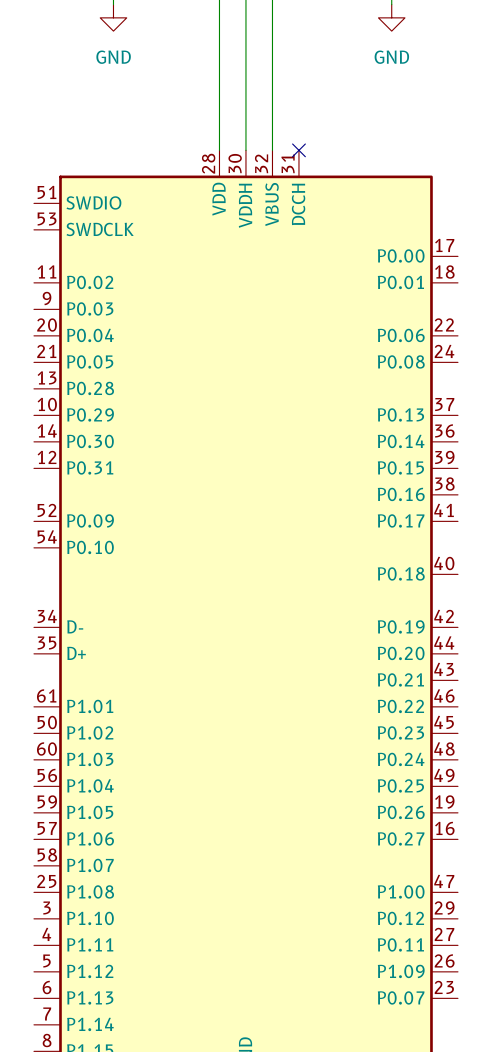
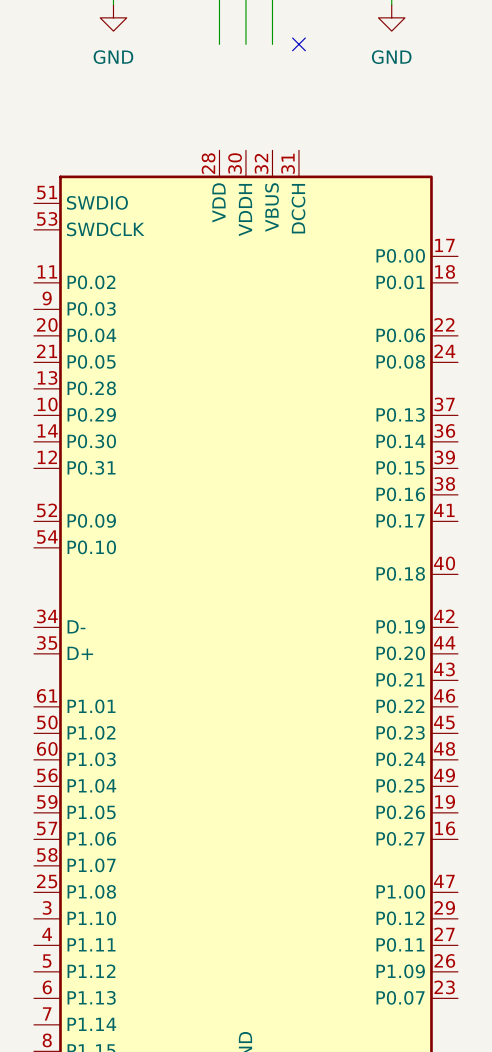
wire: (219, 44) (219, 150) -> none
wire: (245, 44) (245, 150) -> none
wire: (272, 44) (272, 150) -> none
no-connect mark: none -> (298, 44)
no-connect mark: (298, 150) -> none

